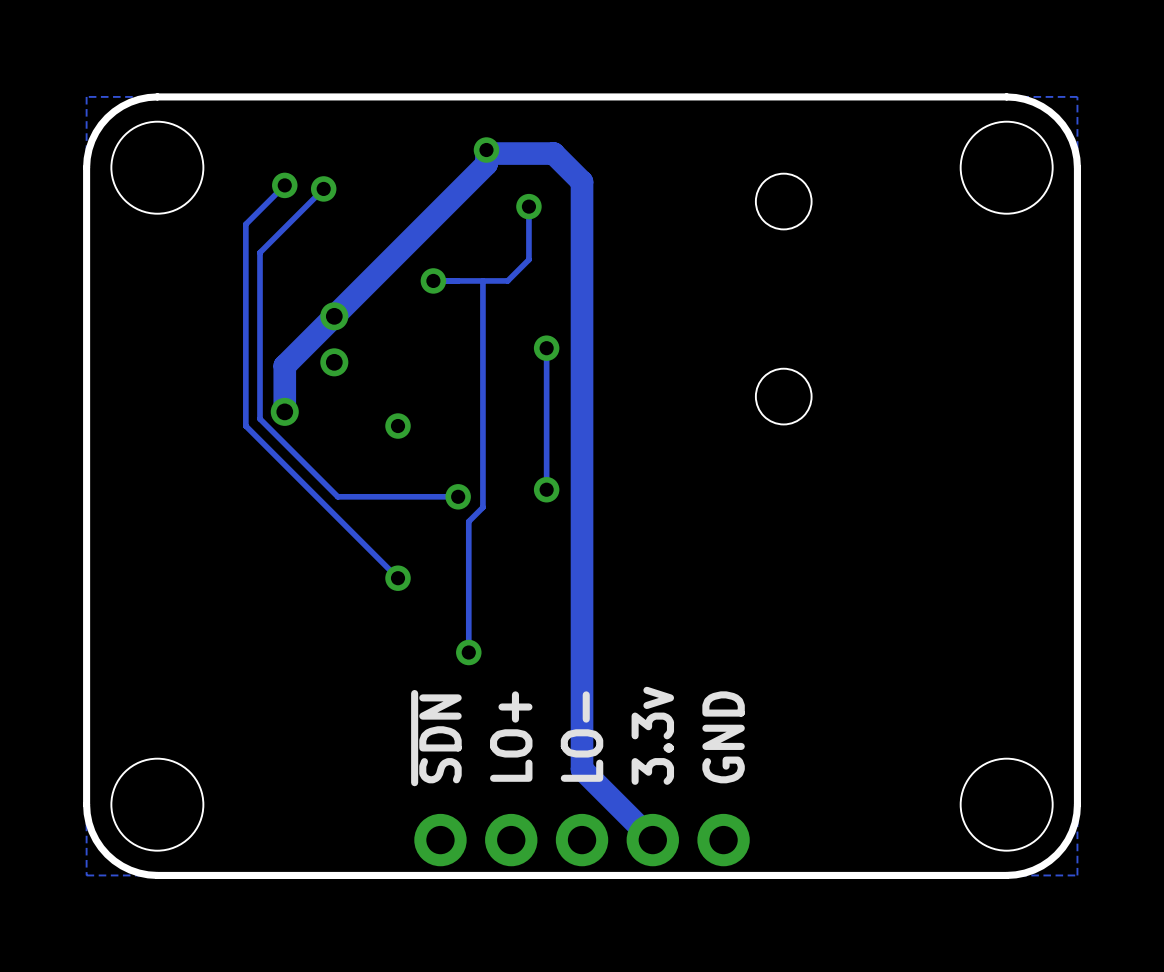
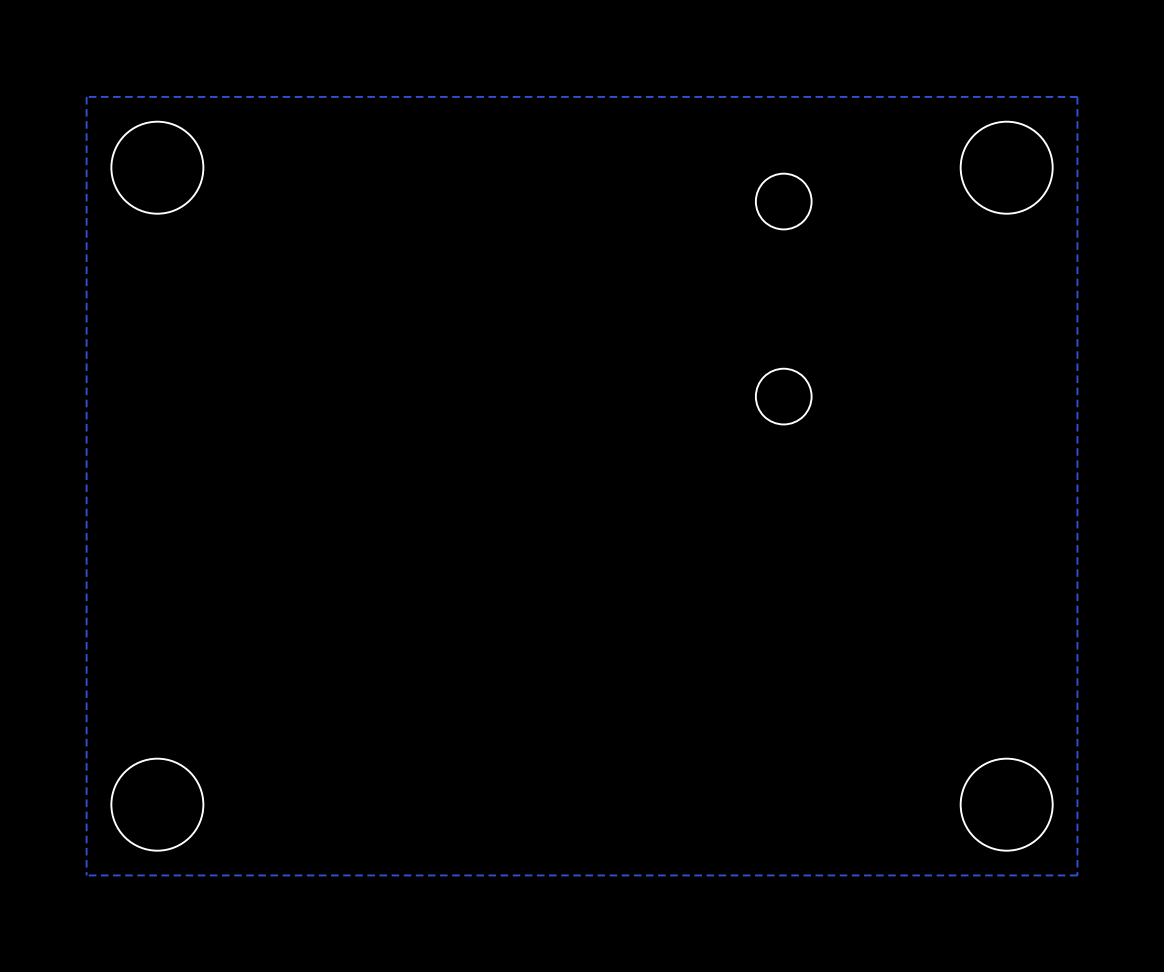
board edge: (1006, 96) (157, 96) (139, 99) (114, 111) (101, 124) (91, 140) (86, 167) (86, 804) (89, 823) (101, 847) (114, 860) (130, 870) (157, 875) (1006, 875) (1024, 873) (1049, 860) (1062, 847) (1072, 831) (1077, 804) (1077, 167) (1072, 140) (1056, 117) (1033, 102) (1006, 96) -> none
via: (486, 150) -> none
track: (284, 185) (245, 224) (245, 426) (398, 578) -> none
via: (284, 185) -> none
track: (323, 188) (260, 252) (260, 418) (337, 496) (458, 496) -> none
via: (323, 188) -> none
track: (528, 206) (528, 259) (507, 280) (433, 280) -> none
via: (528, 206) -> none
via: (433, 280) -> none
track: (482, 280) (482, 507) (468, 521) (468, 652) -> none
via: (334, 316) -> none
track: (546, 348) (546, 489) -> none
via: (546, 348) -> none
via: (334, 362) -> none
track: (284, 411) (284, 365) (486, 164) (486, 150) (490, 153) (553, 153) (582, 181) (582, 769) (652, 840) -> none
via: (284, 411) -> none
via: (398, 426) -> none
via: (546, 489) -> none
via: (458, 496) -> none
via: (398, 578) -> none
via: (468, 652) -> none
text: 3.3v (652, 735) -> none
text: LO+ (511, 736) -> none
text: LO- (582, 736) -> none
text: GND (723, 737) -> none
text: ~{SDN} (436, 738) -> none
part: (582, 840) -> none

